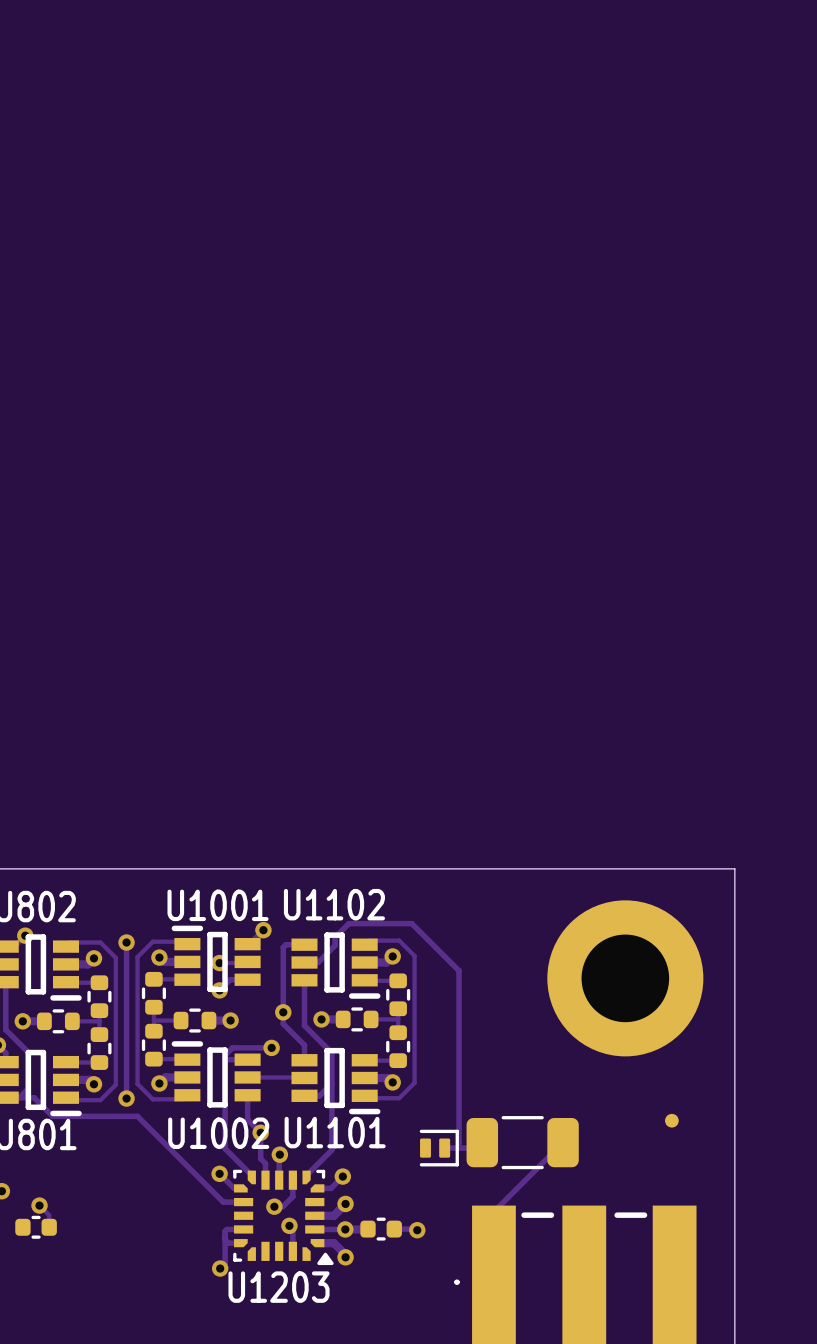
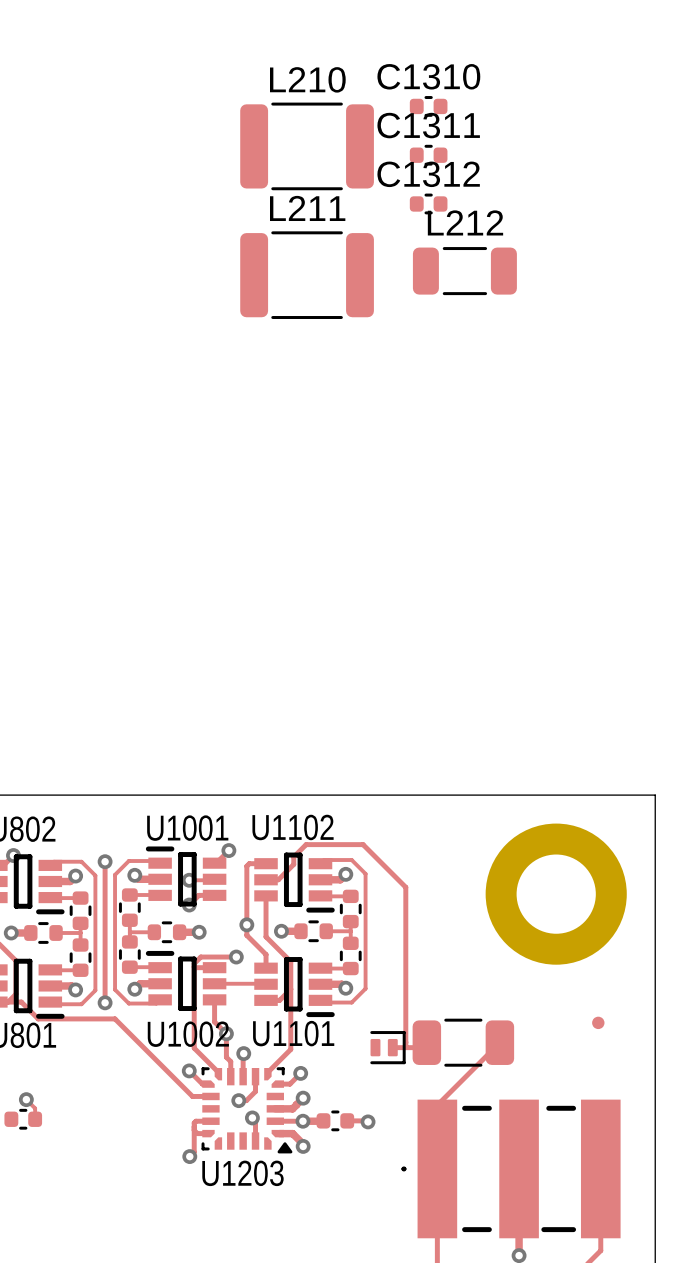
C1310: none -> (428, 106)
L210: none -> (307, 146)
C1311: none -> (428, 155)
C1312: none -> (428, 203)
L212: none -> (464, 271)
L211: none -> (307, 275)

